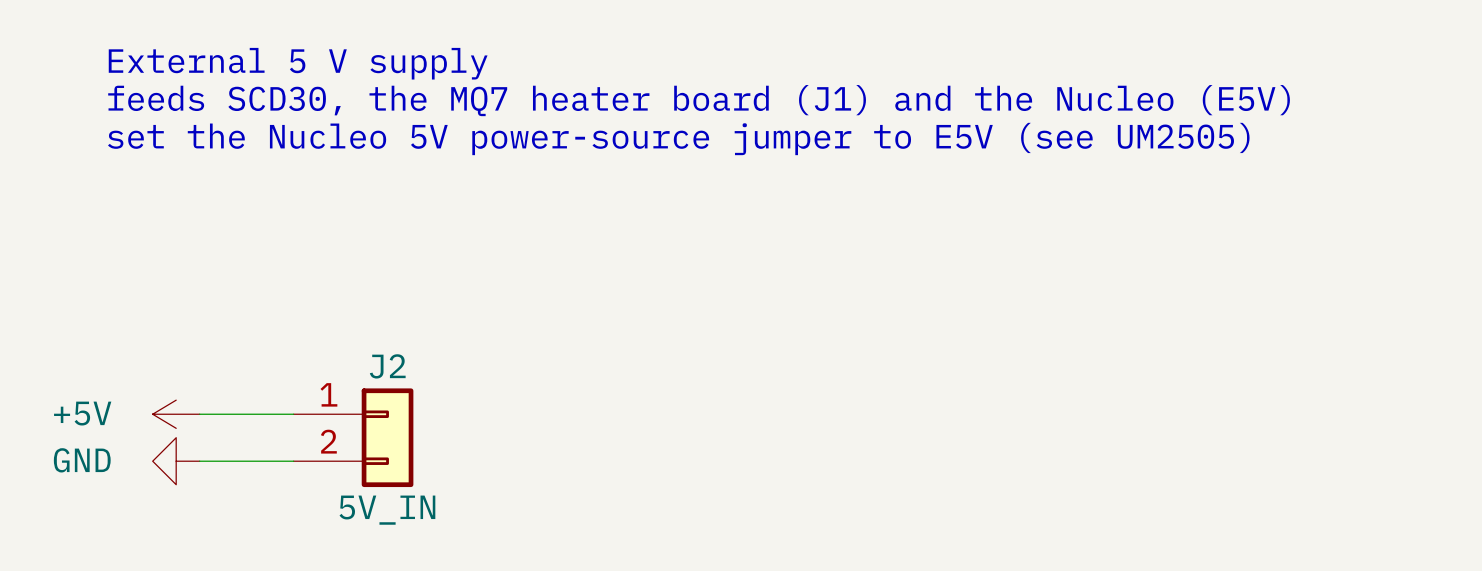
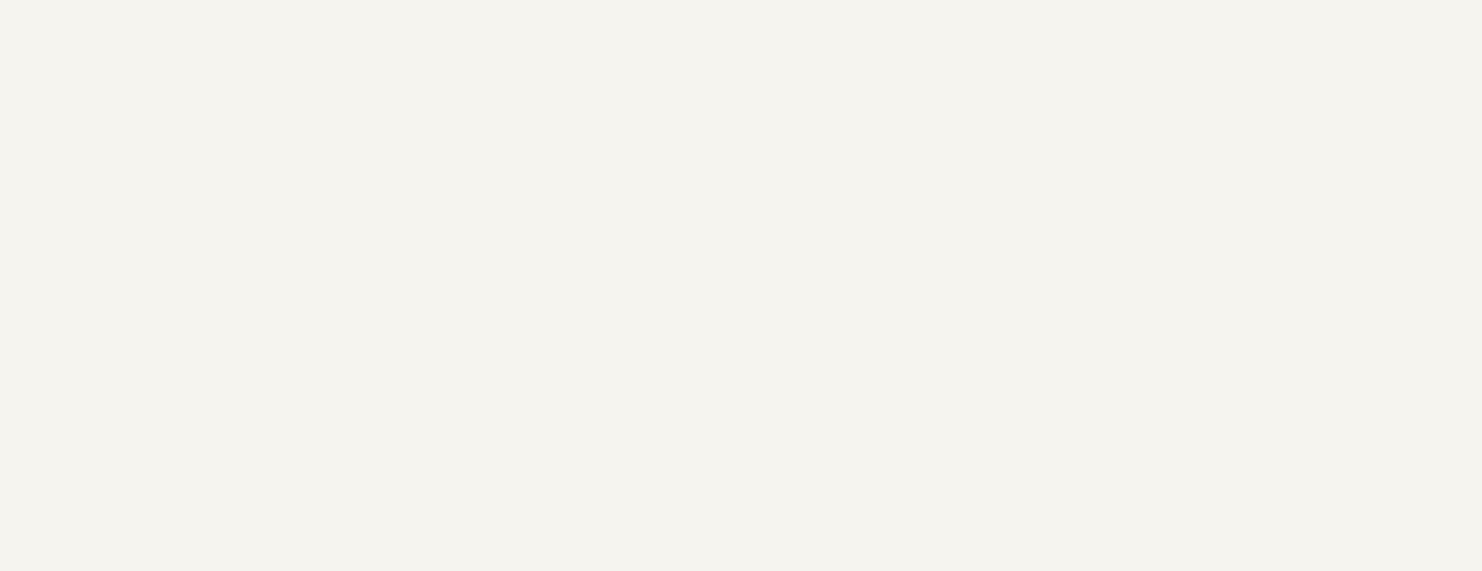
text: External 5 V supply (298, 63) -> none
text: feeds SCD30, the MQ7 heater board (J1) and the Nucleo (E5V) (699, 100) -> none
text: set the Nucleo 5V power-source jumper to E5V (see UM2505) (678, 139) -> none
power symbol: +5V (176, 414) -> none
wire: (199, 414) (293, 414) -> none
J2: 5V_IN (353, 437) -> none
power symbol: GND (176, 461) -> none
wire: (199, 461) (293, 461) -> none

